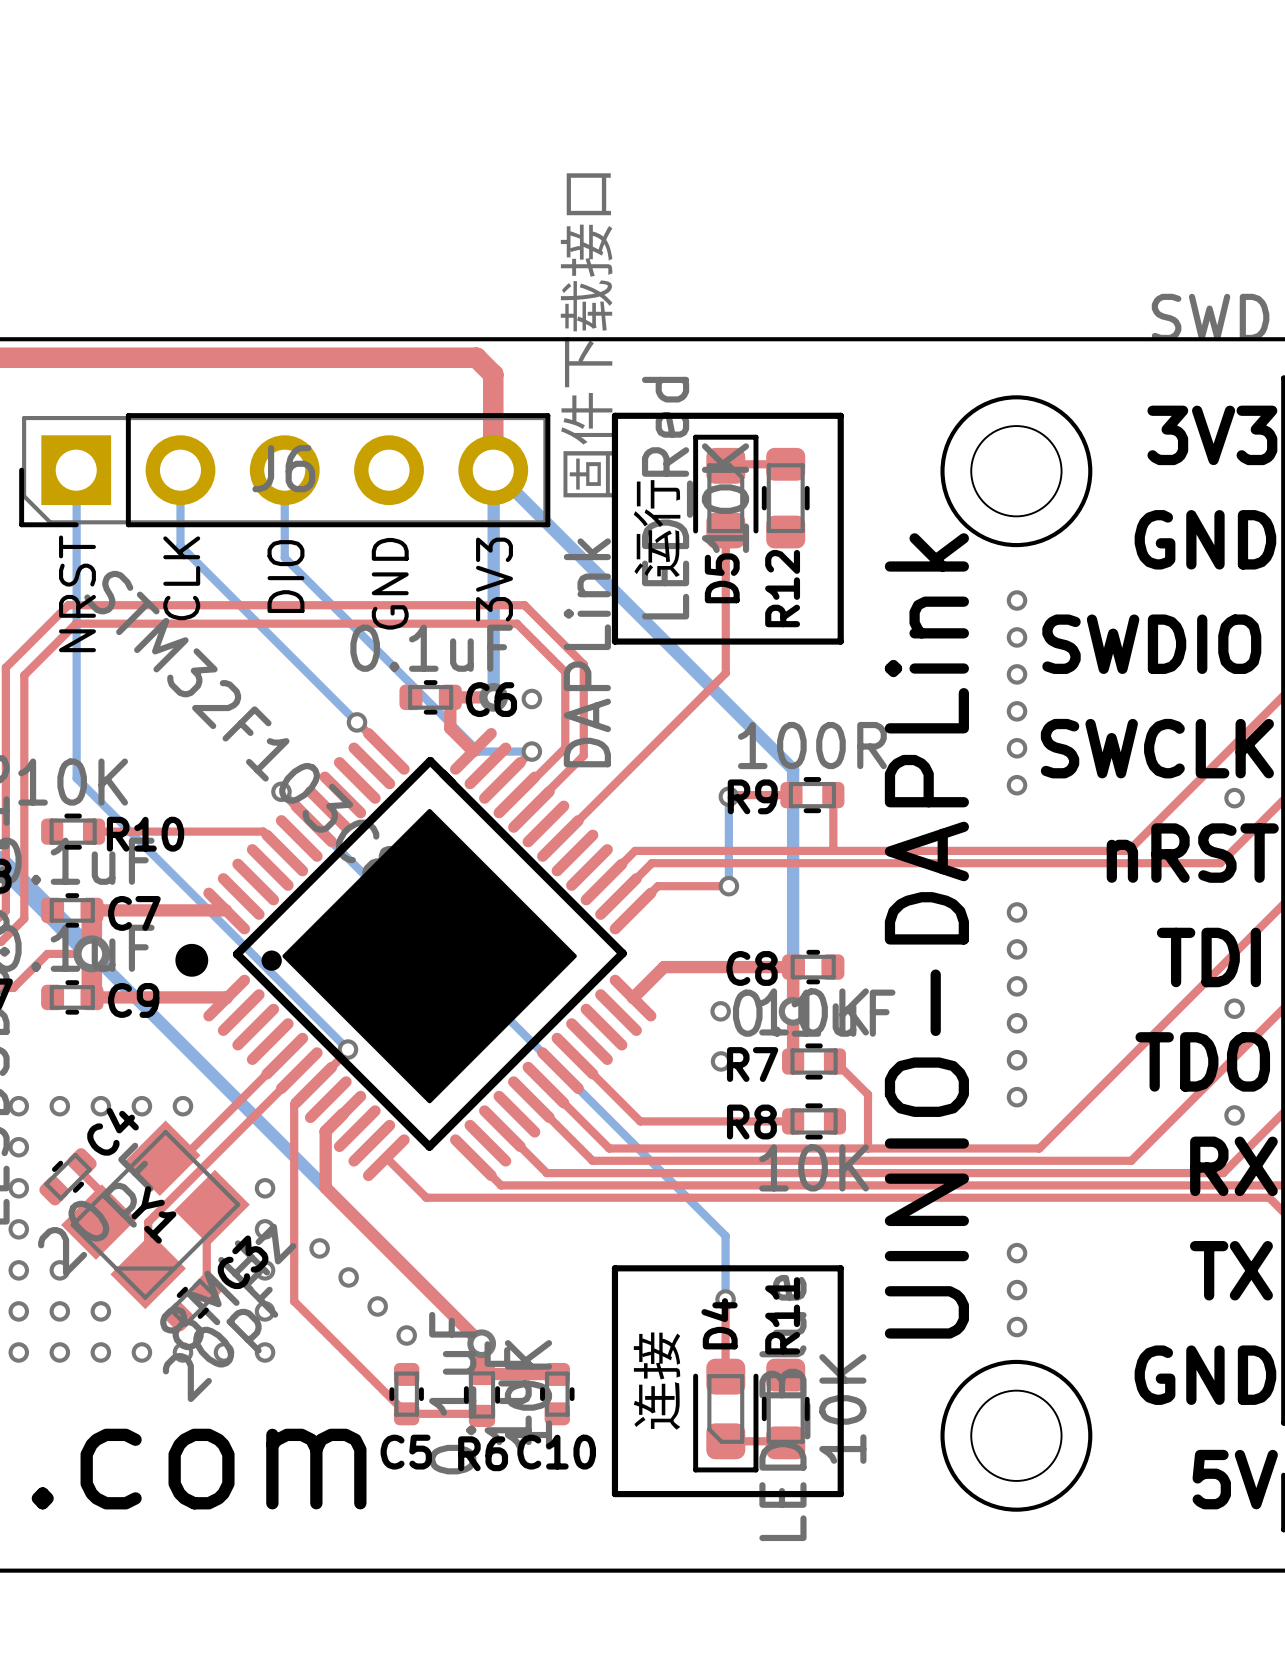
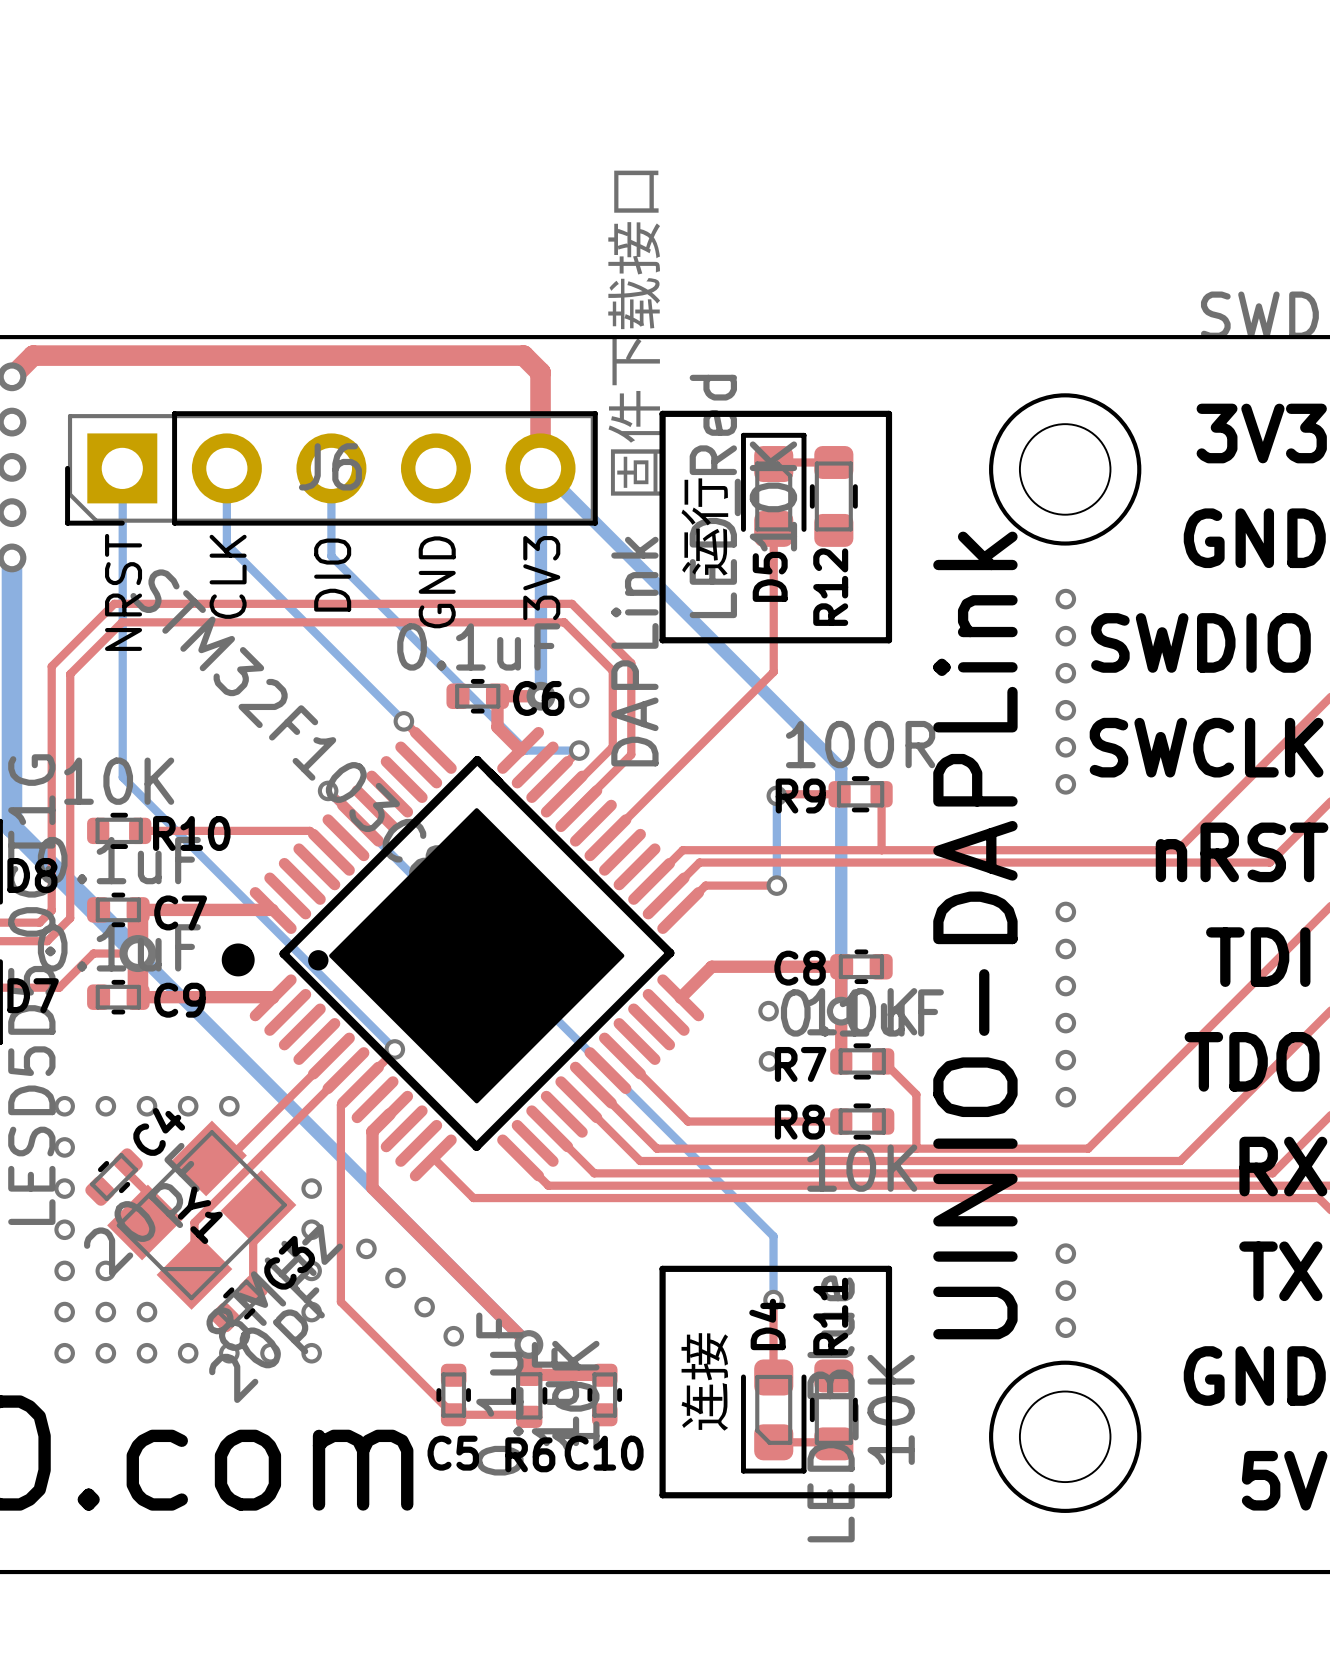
via: (1234, 798) -> none
via: (1234, 1008) -> none
via: (1234, 1115) -> none

